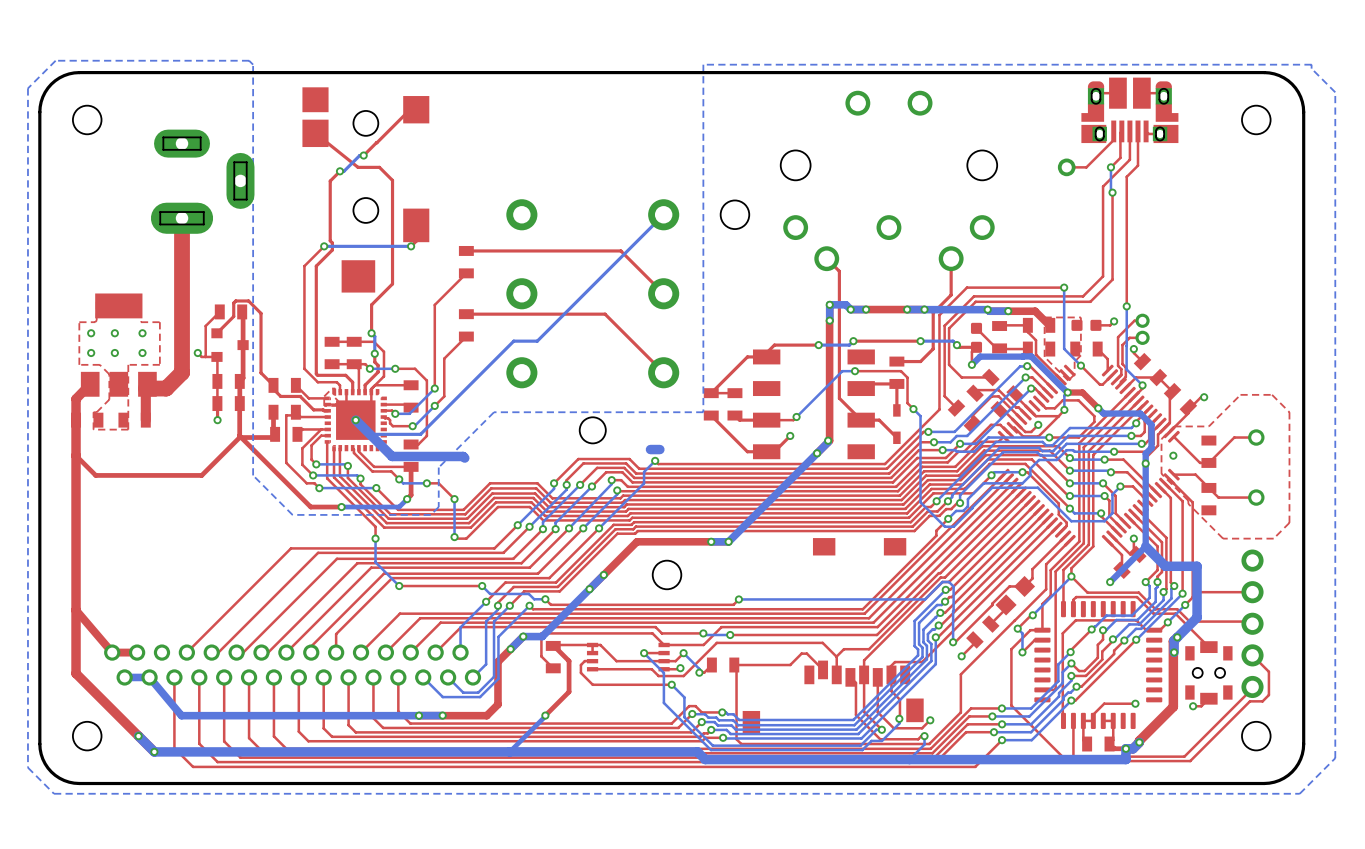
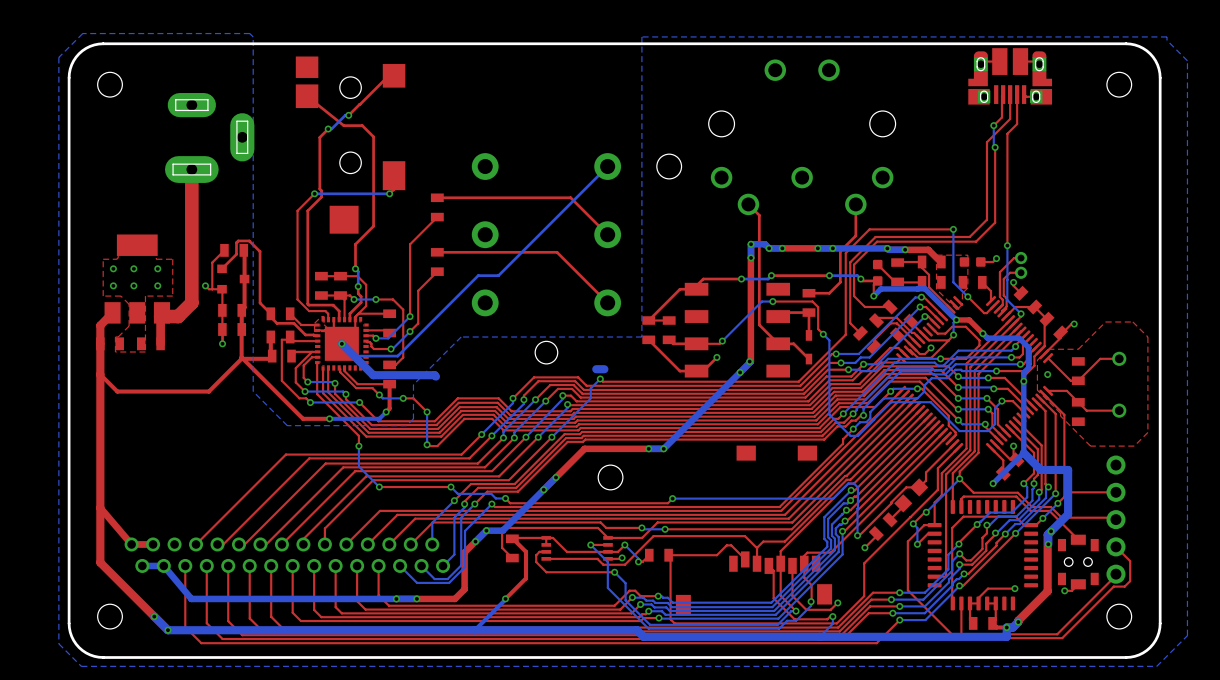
top track: (1113, 131) (1114, 139) (1086, 167) (1066, 167) -> none
part: (1066, 167) -> none

